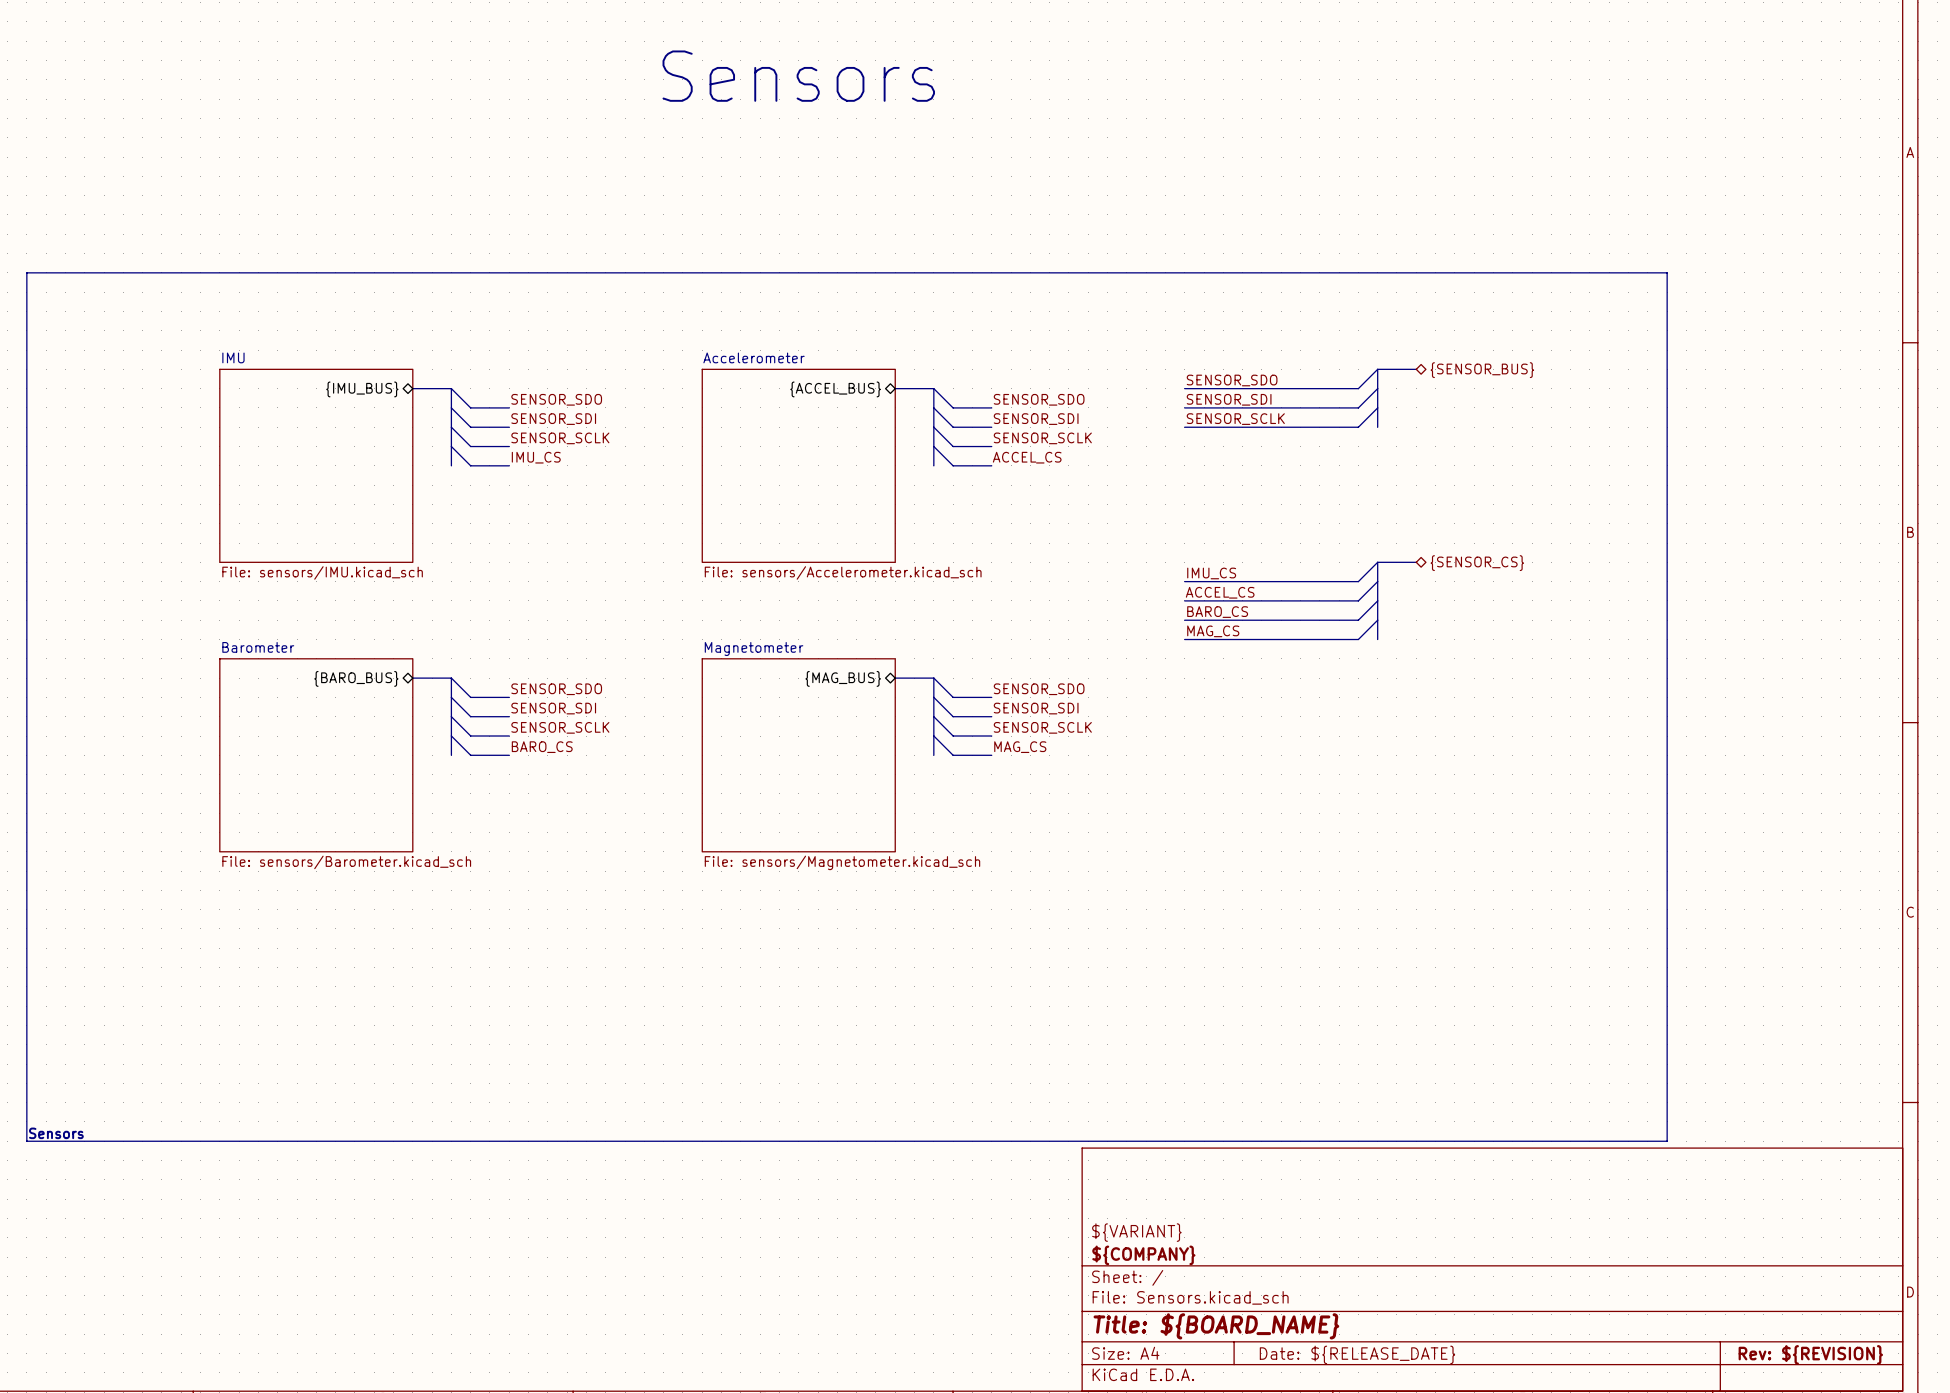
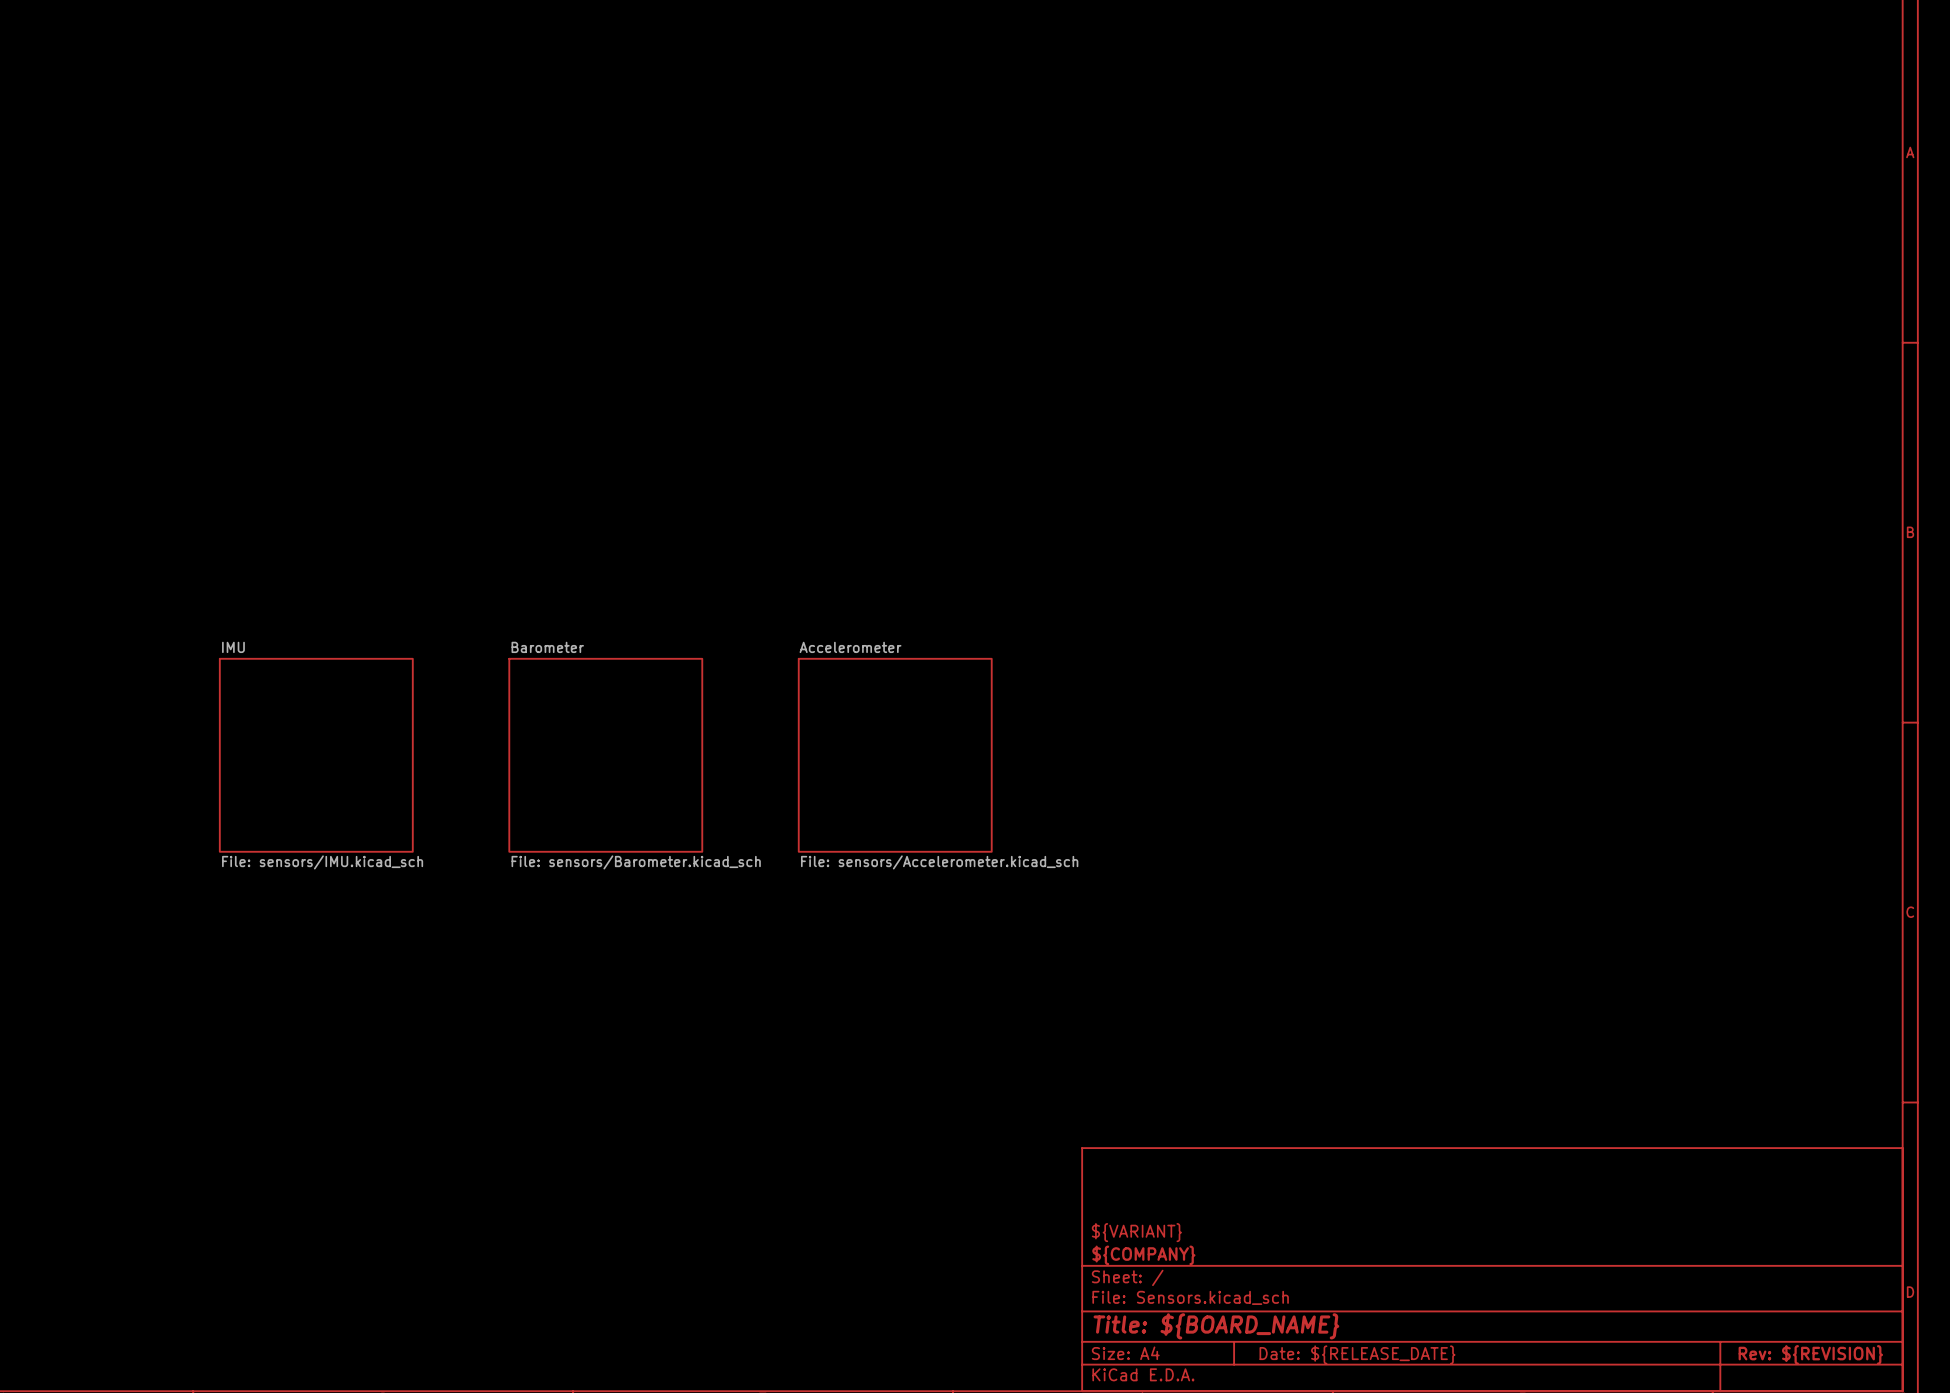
text: Sensors (798, 76) -> none
line: (26, 272) (1667, 272) (1667, 1141) (26, 1141) (26, 272) -> none
wire: (1377, 369) (1358, 388) (1184, 388) -> none
bus: (1416, 369) (1377, 369) (1377, 427) -> none
hierarchical label: {SENSOR_BUS} (1482, 370) -> none
label: SENSOR_SDO (1232, 380) -> none
bus: (412, 388) (451, 388) (451, 465) -> none
wire: (451, 388) (470, 407) (509, 407) -> none
bus: (895, 388) (933, 388) (933, 465) -> none
wire: (933, 388) (953, 407) (991, 407) -> none
wire: (1377, 388) (1358, 407) (1184, 407) -> none
sheet pin: {IMU_BUS} (362, 389) -> none
sheet pin: {ACCEL_BUS} (835, 389) -> none
label: SENSOR_SDO (556, 399) -> none
label: SENSOR_SDO (1039, 399) -> none
label: SENSOR_SDI (1229, 399) -> none
wire: (451, 407) (470, 427) (509, 427) -> none
wire: (933, 407) (953, 427) (991, 427) -> none
wire: (1377, 407) (1358, 427) (1184, 427) -> none
label: SENSOR_SDI (553, 419) -> none
label: SENSOR_SDI (1036, 419) -> none
label: SENSOR_SCLK (1235, 419) -> none
wire: (451, 427) (470, 446) (509, 446) -> none
wire: (933, 427) (953, 446) (991, 446) -> none
label: SENSOR_SCLK (560, 438) -> none
label: SENSOR_SCLK (1042, 438) -> none
wire: (451, 446) (470, 465) (509, 465) -> none
wire: (933, 446) (953, 465) (991, 465) -> none
label: IMU_CS (536, 457) -> none
label: ACCEL_CS (1027, 457) -> none
sheet IMU: File: sensors/IMU.kicad_sch (316, 465) -> none
sheet Accelerometer: File: sensors/Accelerometer.kicad_sch (798, 465) -> none
wire: (1377, 562) (1358, 581) (1184, 581) -> none
bus: (1416, 562) (1377, 562) (1377, 639) -> none
hierarchical label: {SENSOR_CS} (1477, 563) -> none
label: IMU_CS (1211, 573) -> none
wire: (1377, 581) (1358, 600) (1184, 600) -> none
label: ACCEL_CS (1220, 592) -> none
wire: (1377, 600) (1358, 620) (1184, 620) -> none
label: BARO_CS (1217, 612) -> none
wire: (1377, 620) (1358, 639) (1184, 639) -> none
label: MAG_CS (1213, 631) -> none
sheet Barometer name: Barometer (258, 647) -> IMU (233, 647)
sheet pin: {BARO_BUS} (356, 678) -> none
bus: (412, 678) (451, 678) (451, 755) -> none
wire: (451, 678) (470, 697) (509, 697) -> none
sheet pin: {MAG_BUS} (843, 678) -> none
bus: (895, 678) (933, 678) (933, 755) -> none
wire: (933, 678) (953, 697) (991, 697) -> none
label: SENSOR_SDO (556, 689) -> none
label: SENSOR_SDO (1039, 689) -> none
wire: (451, 697) (470, 716) (509, 716) -> none
wire: (933, 697) (953, 716) (991, 716) -> none
label: SENSOR_SDI (553, 708) -> none
label: SENSOR_SDI (1036, 708) -> none
wire: (451, 716) (470, 736) (509, 736) -> none
wire: (933, 716) (953, 736) (991, 736) -> none
label: SENSOR_SCLK (560, 727) -> none
label: SENSOR_SCLK (1042, 727) -> none
wire: (451, 736) (470, 755) (509, 755) -> none
wire: (933, 736) (953, 755) (991, 755) -> none
label: BARO_CS (542, 747) -> none
label: MAG_CS (1020, 747) -> none
sheet Barometer: none -> File: sensors/Barometer.kicad_sch (605, 755)
sheet Magnetometer: File: sensors/Magnetometer.kicad_sch (798, 755) -> none
sheet Accelerometer: none -> File: sensors/Accelerometer.kicad_sch (895, 755)
sheet Barometer value: File: sensors/Barometer.kicad_sch (346, 862) -> File: sensors/IMU.kicad_sch (322, 862)
text: Sensors (56, 1133) -> none

